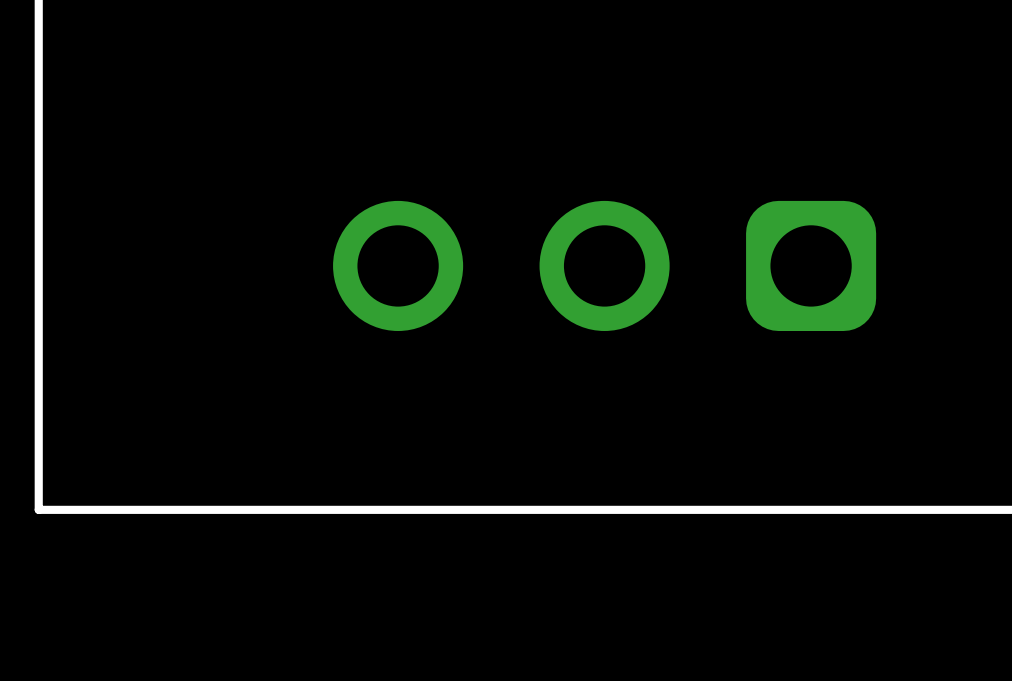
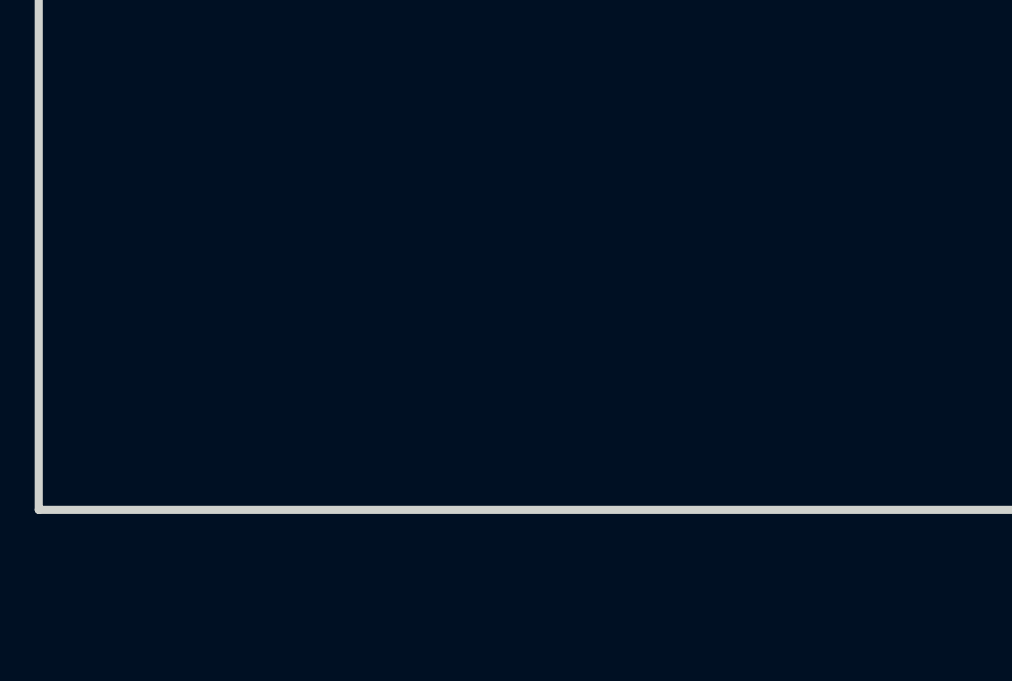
part: (604, 265) -> none

